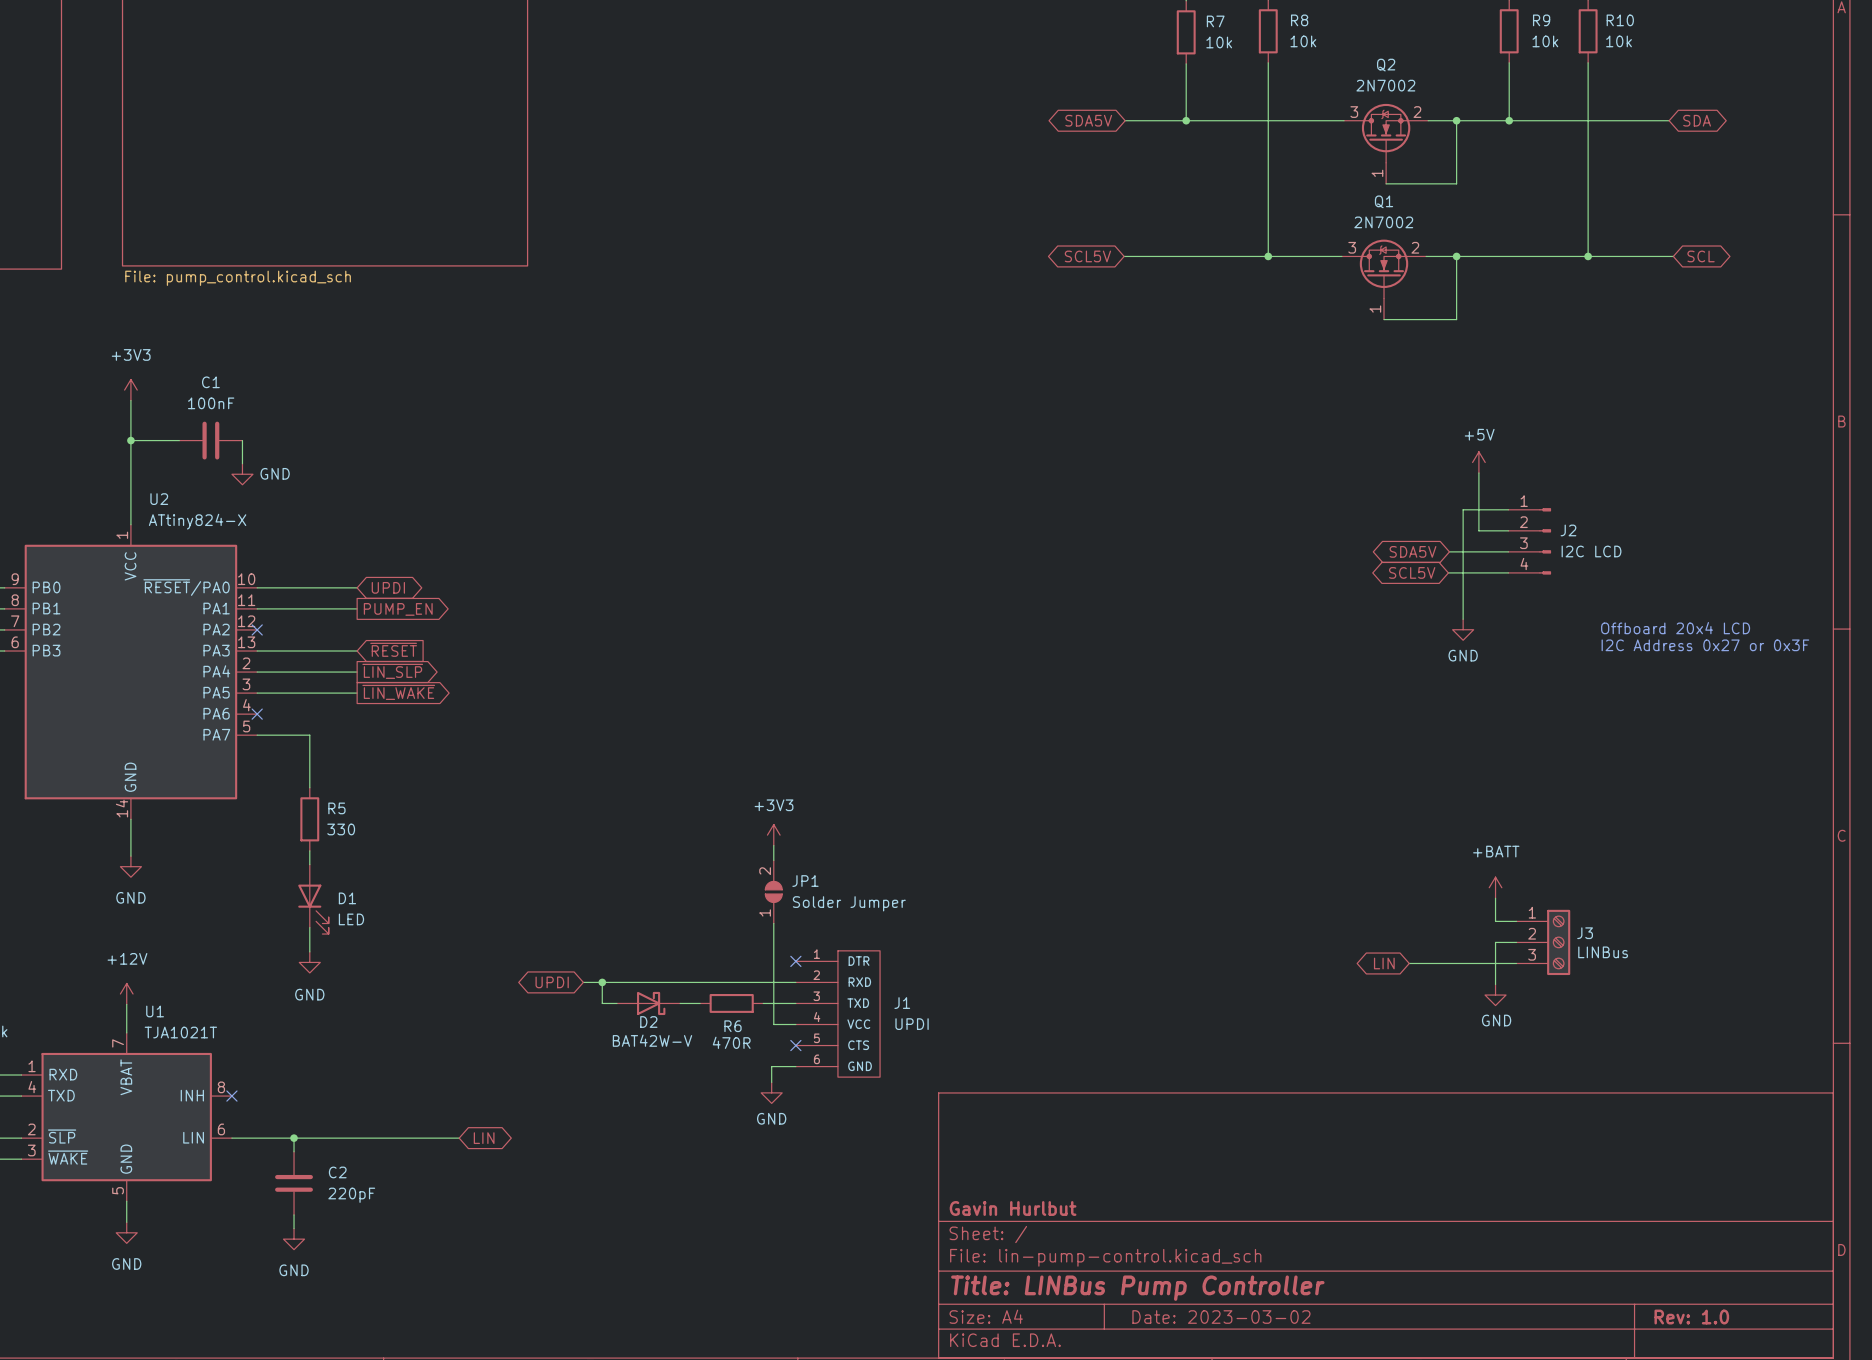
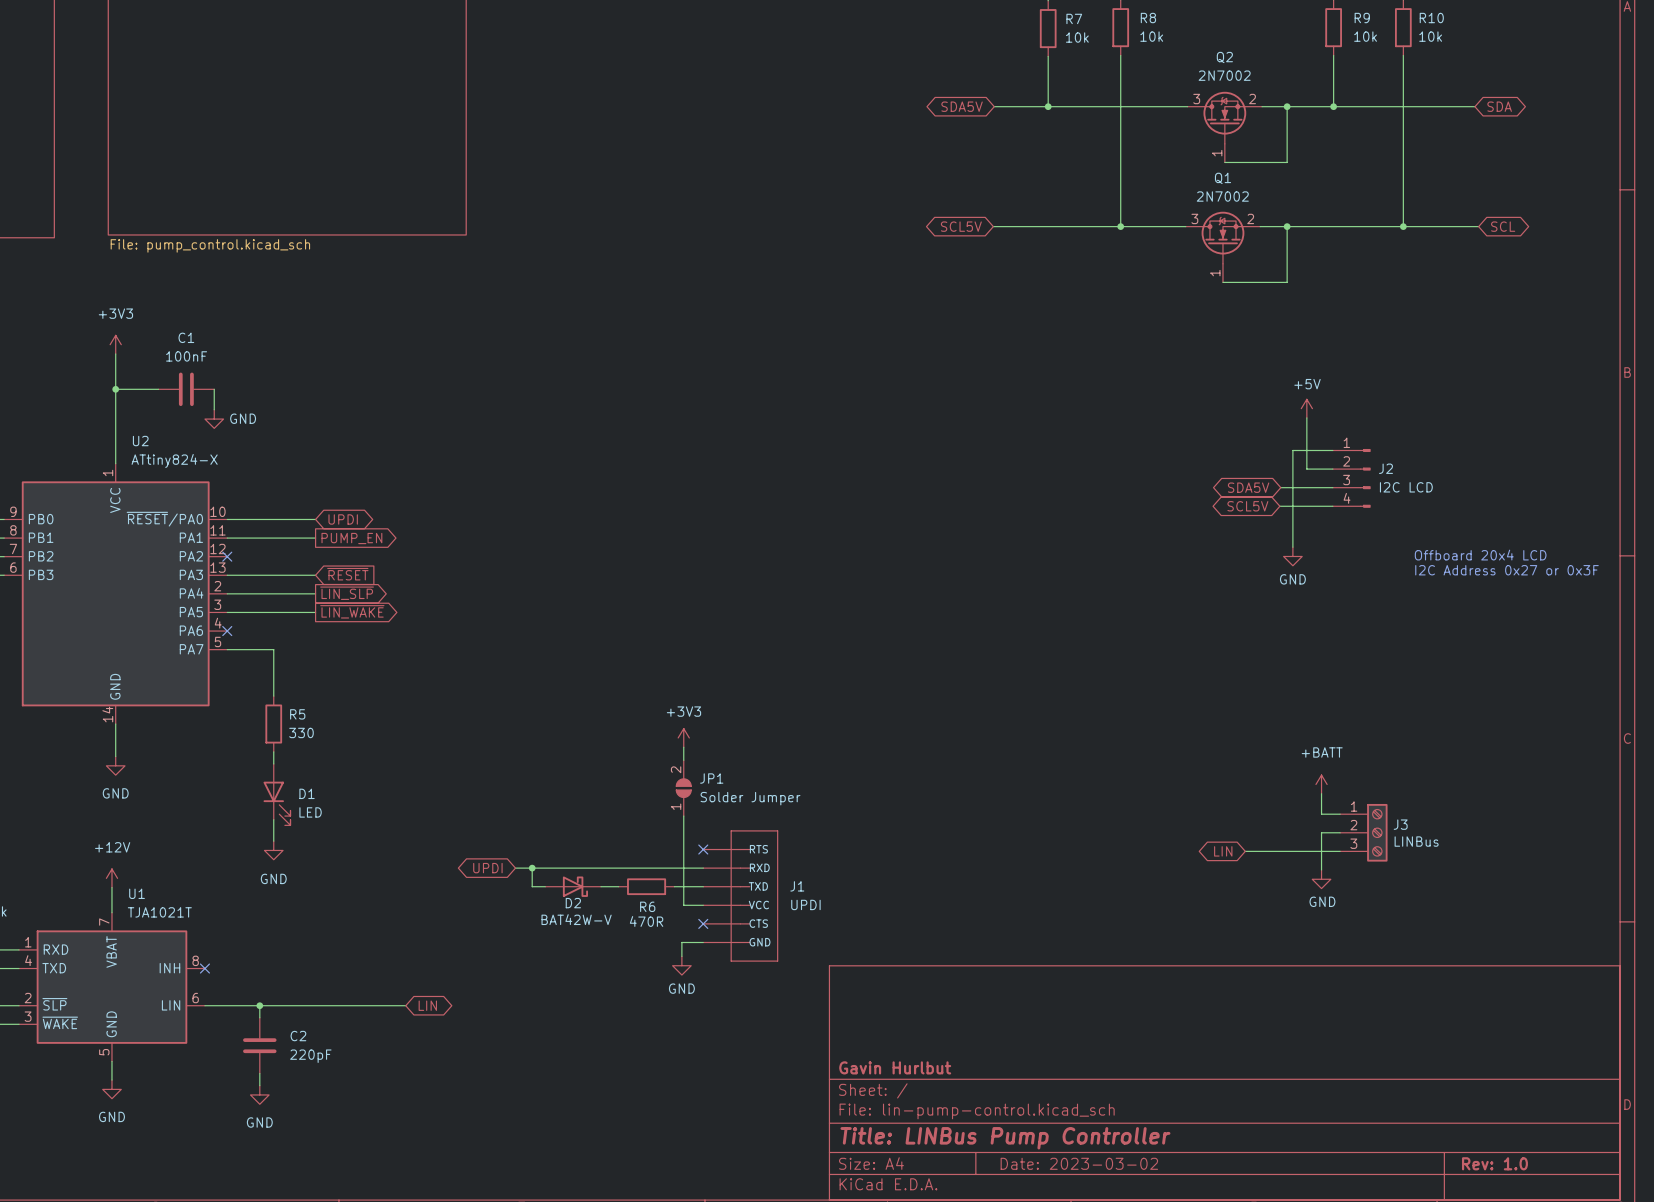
J1 symbol: [795, 950, 881, 1078] -> [703, 830, 778, 962]

